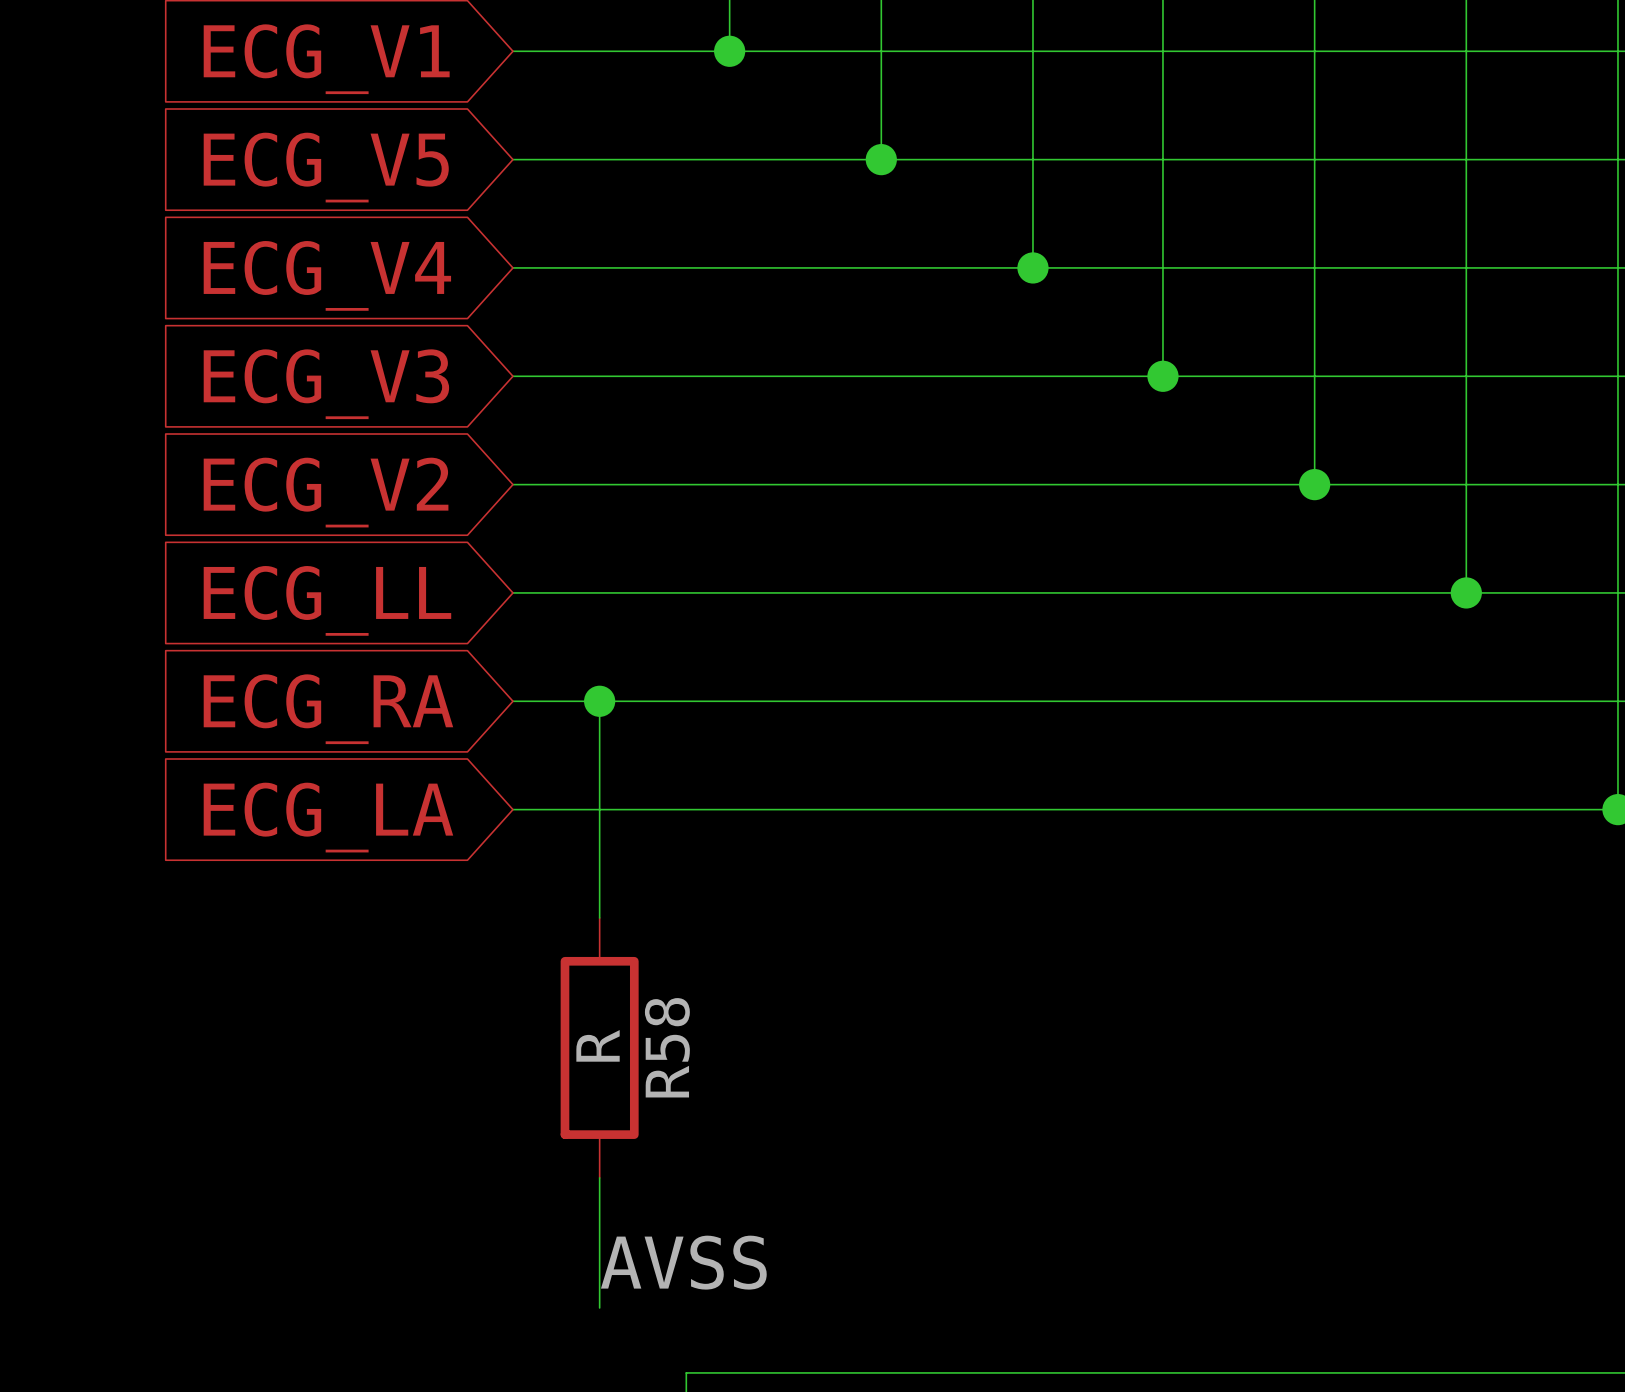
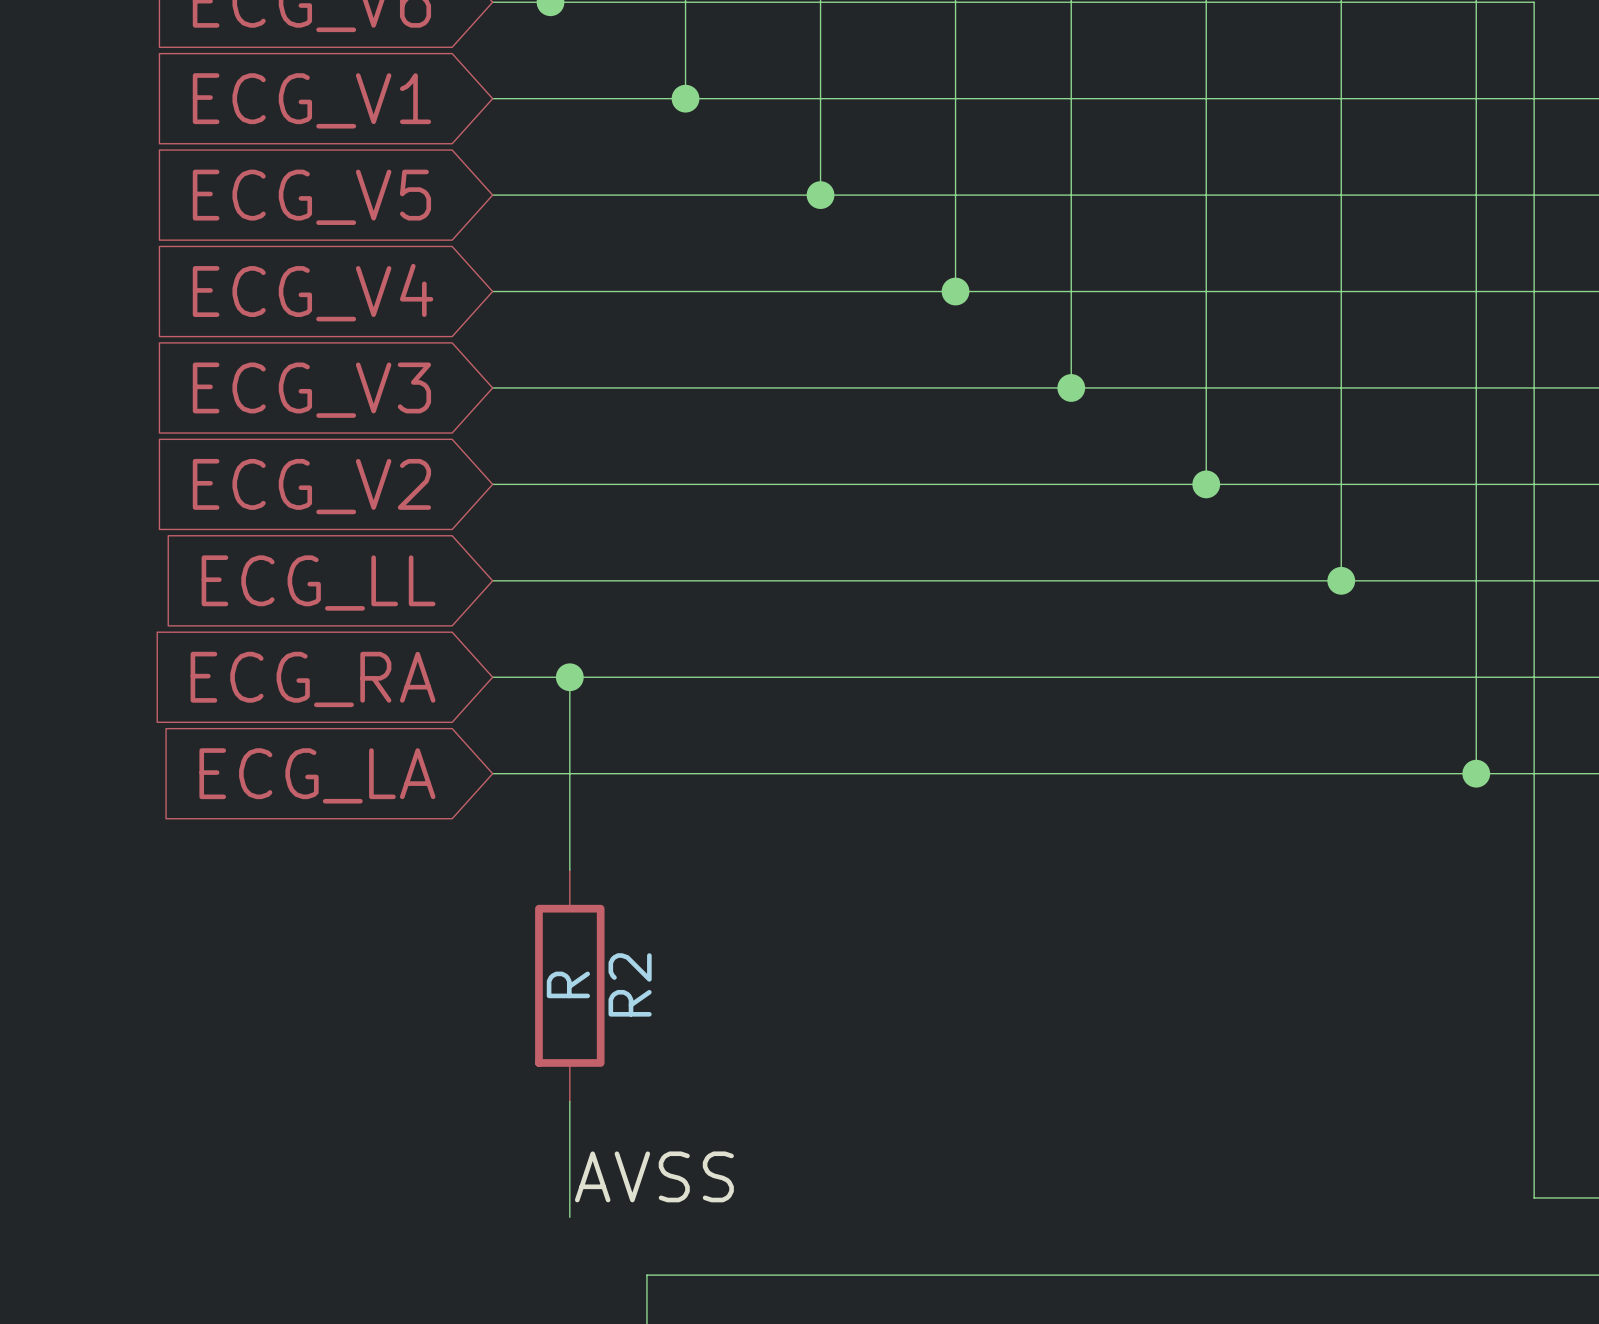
R58 name: R58 (667, 1047) -> R2 (630, 984)

